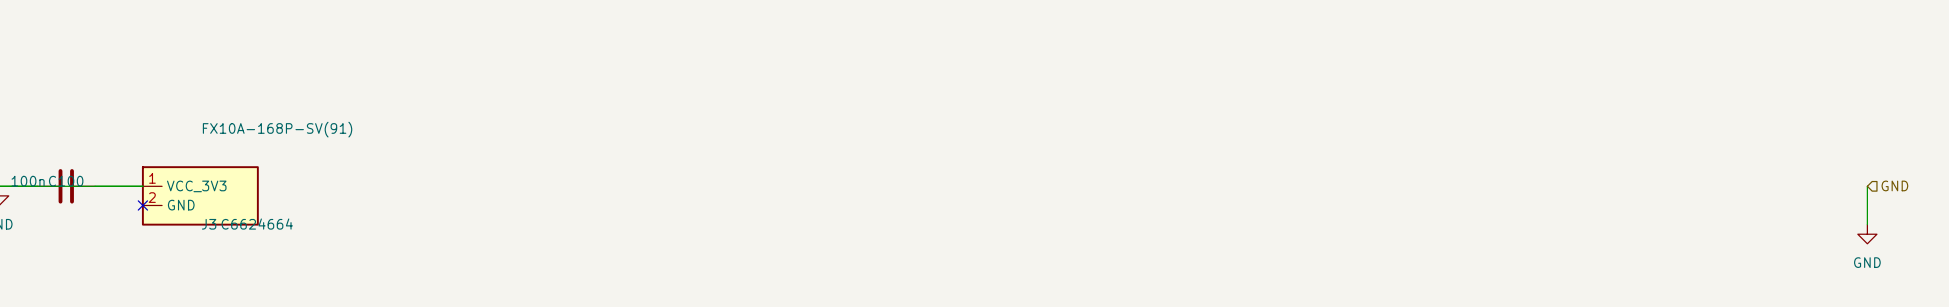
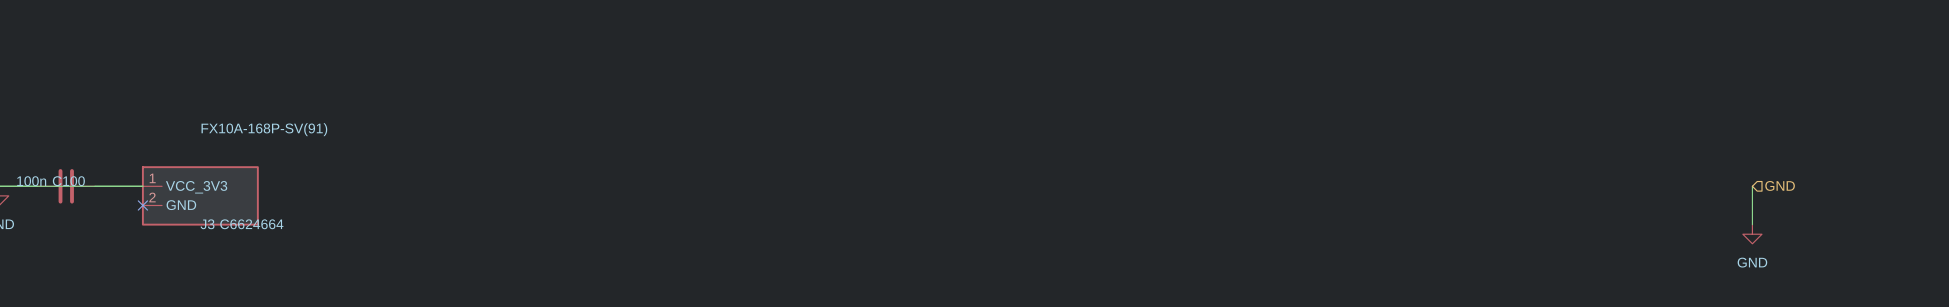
hierarchical label position: GND (1894, 185) -> GND (1780, 185)
wire: (1867, 186) (1867, 224) -> (1752, 186) (1752, 224)
power symbol position: GND (1867, 234) -> GND (1752, 234)

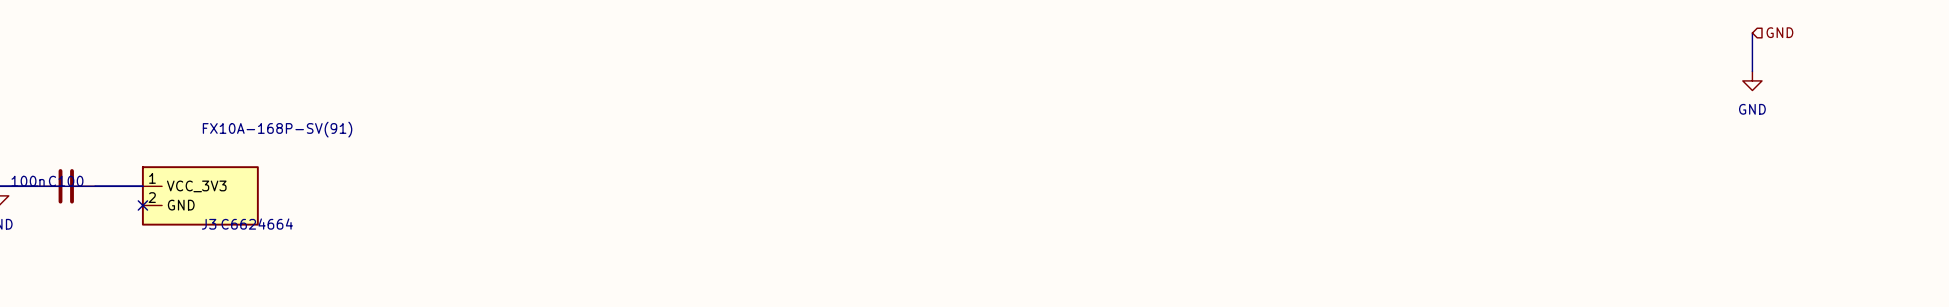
hierarchical label position: GND (1780, 185) -> GND (1779, 32)
wire: (1752, 186) (1752, 224) -> (1752, 33) (1752, 71)
power symbol position: GND (1752, 234) -> GND (1752, 80)

